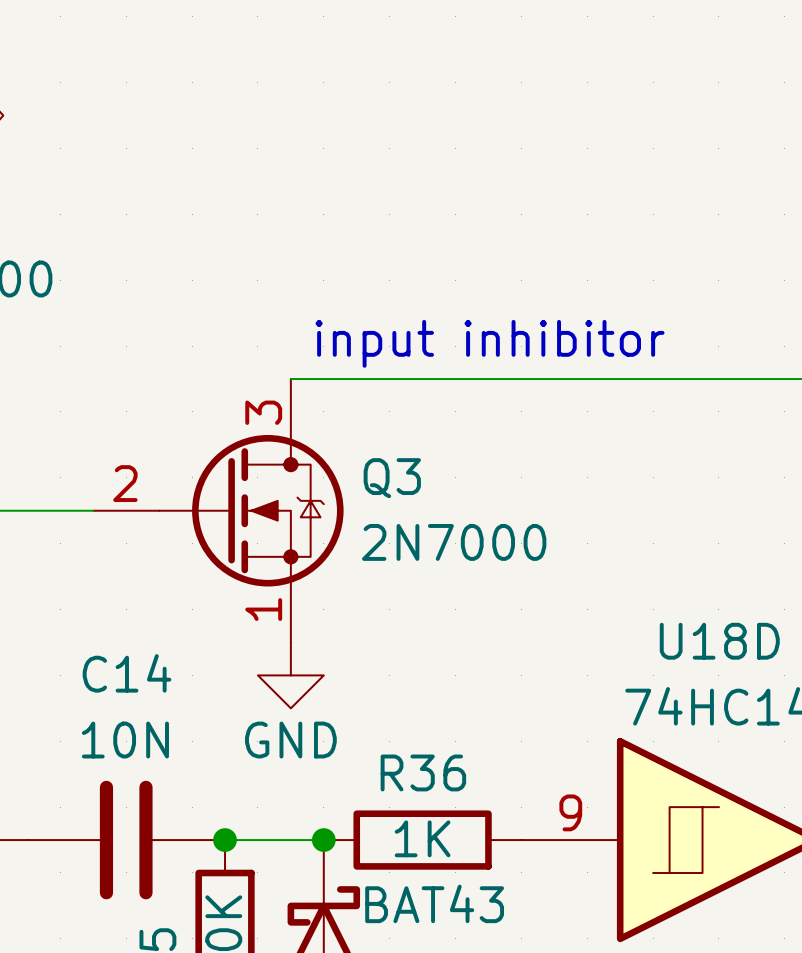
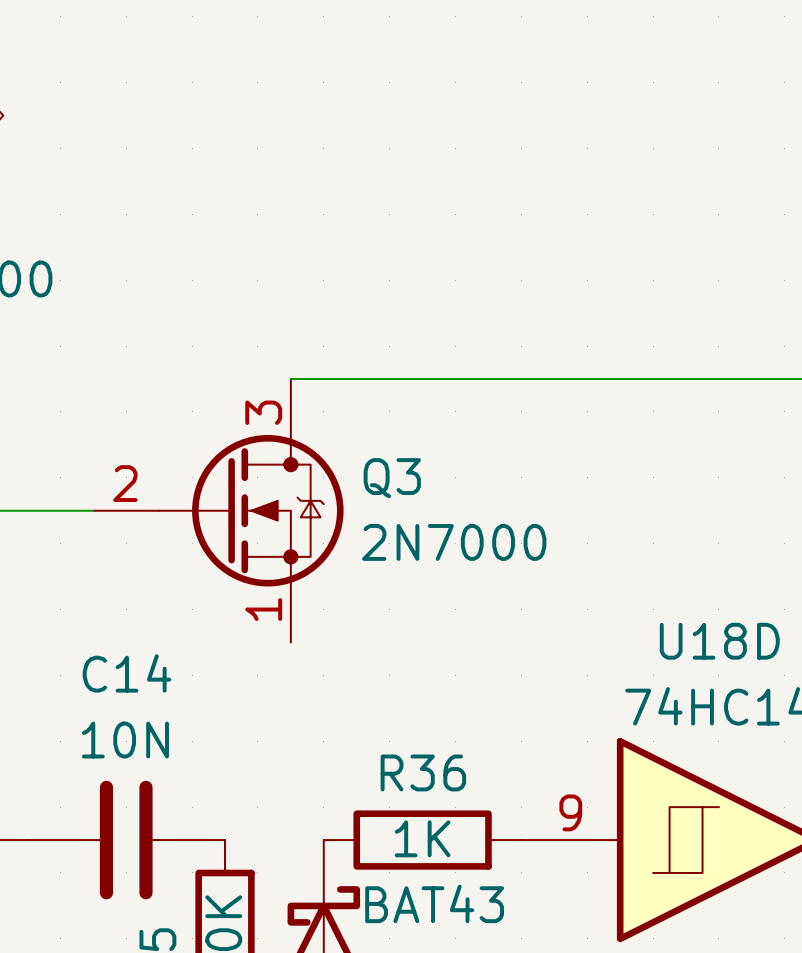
text: input inhibitor (490, 343) -> none
power symbol: GND (290, 675) -> none
wire: (225, 840) (323, 840) -> none
junction: (225, 840) -> none
junction: (323, 840) -> none

